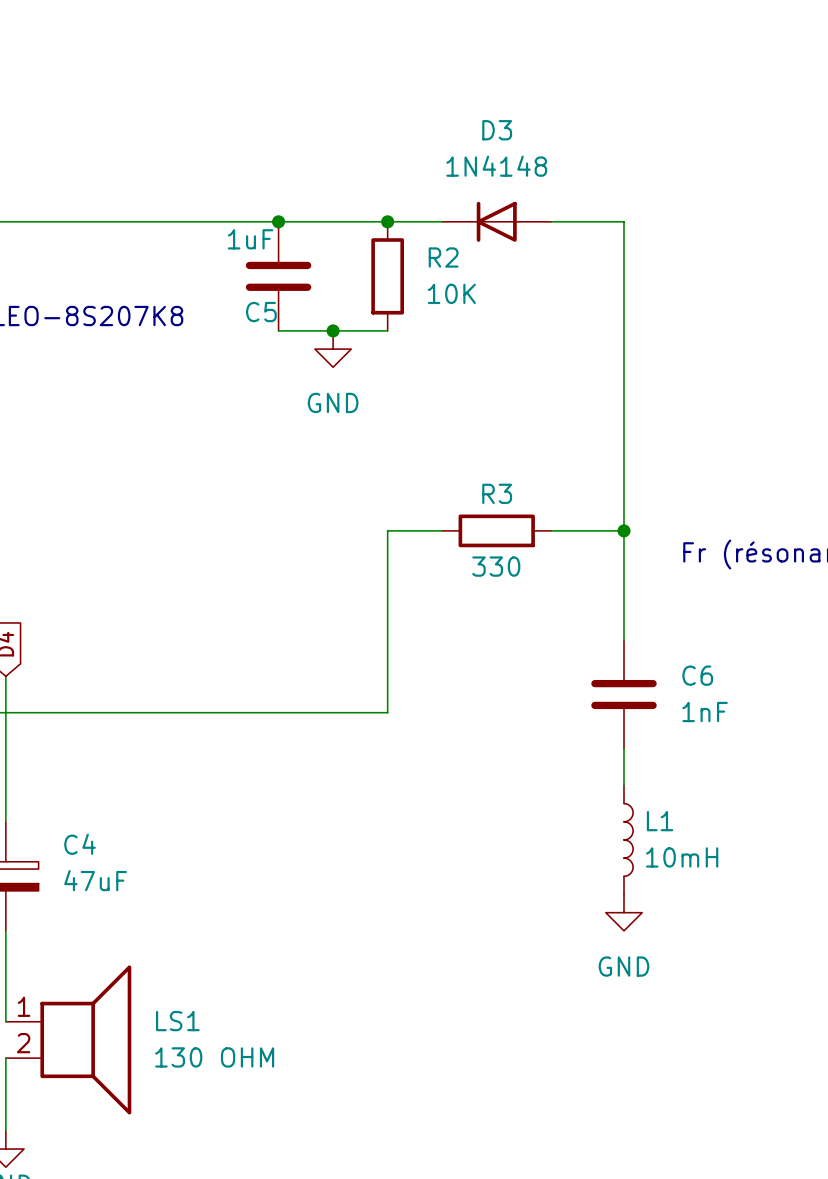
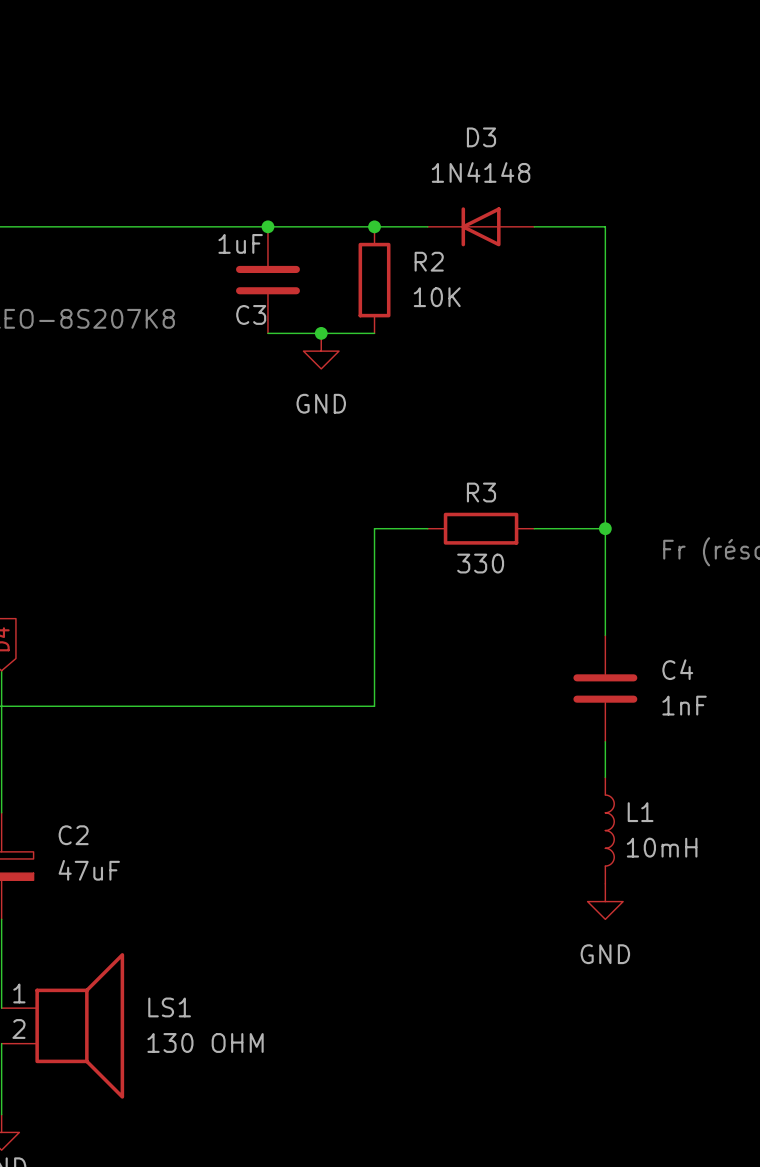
C5 name: C5 (261, 312) -> C3 (251, 314)
C6 name: C6 (697, 675) -> C4 (677, 669)
C4 name: C4 (80, 844) -> C2 (73, 835)

